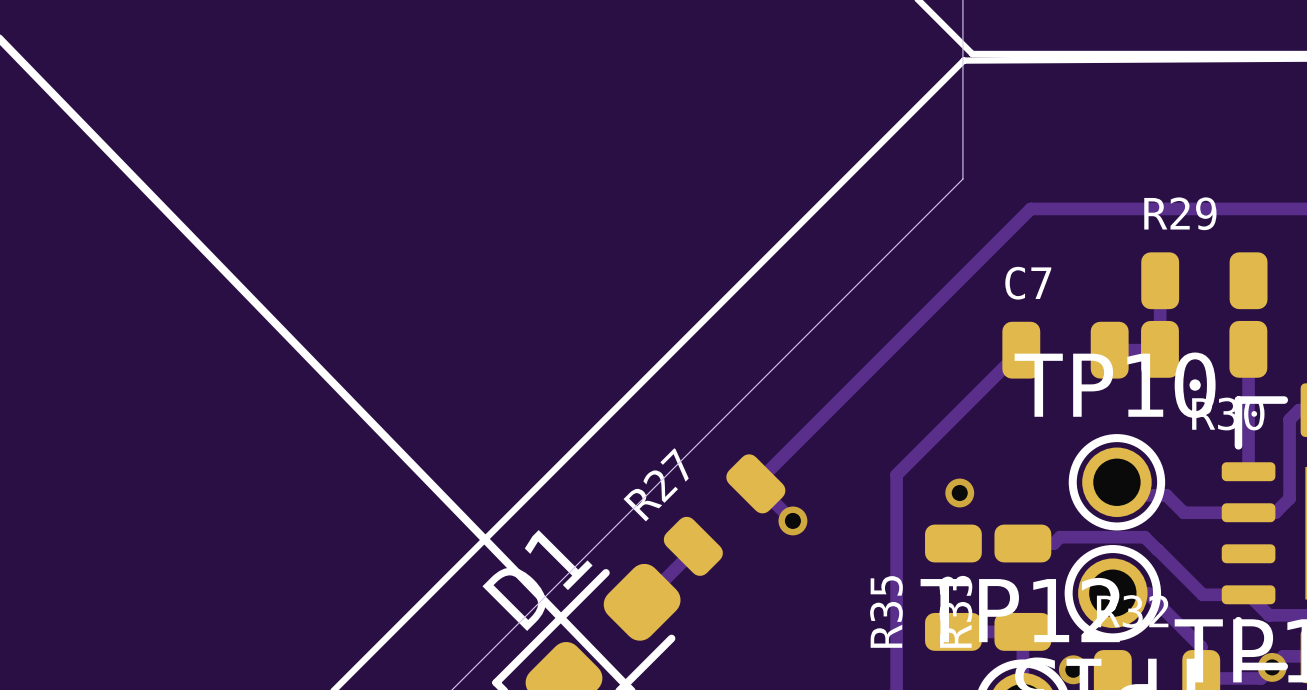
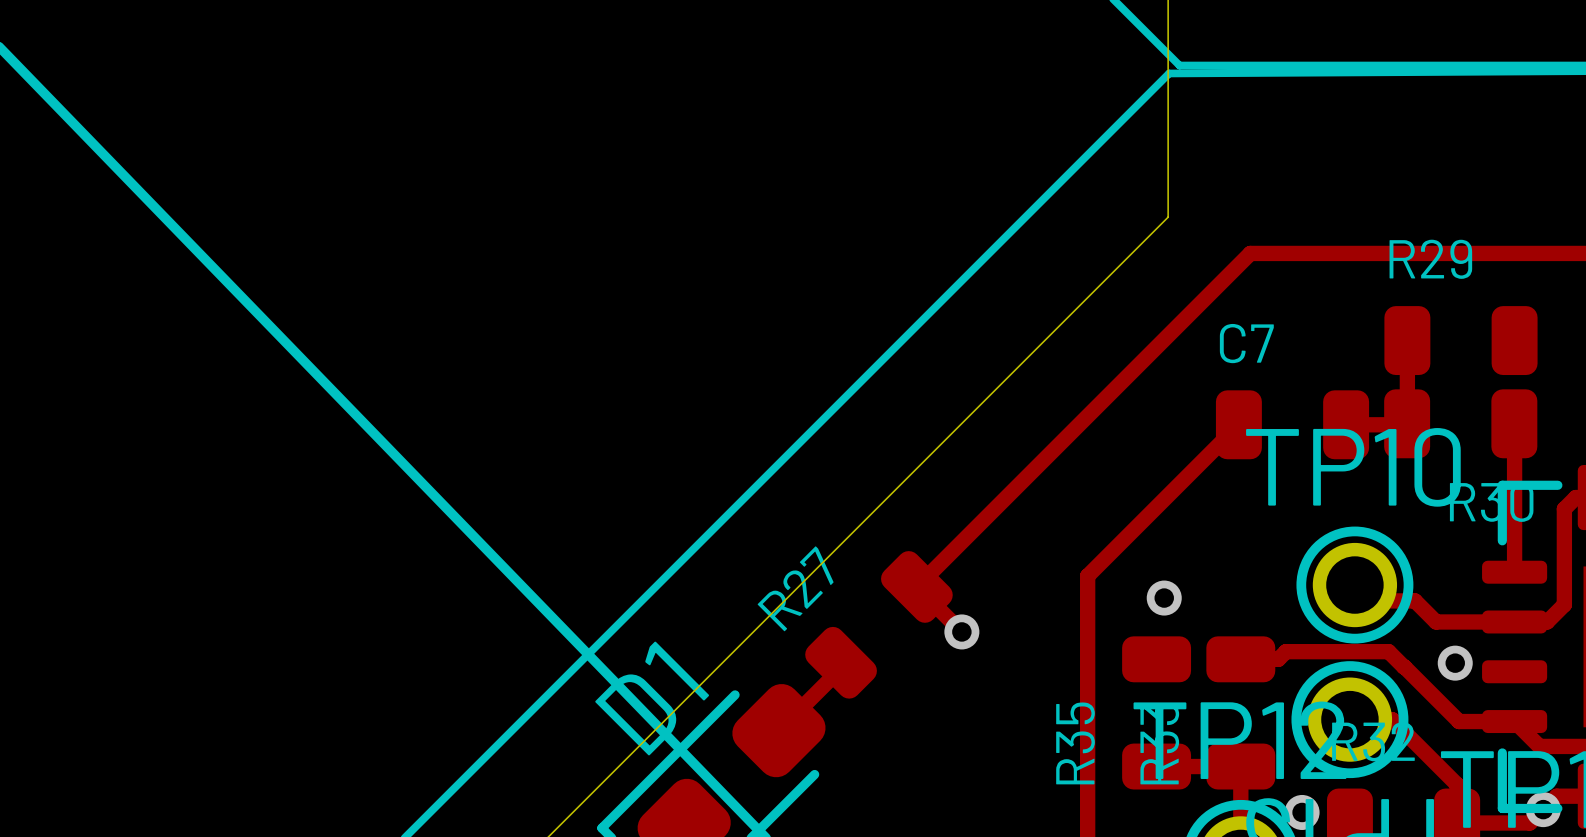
via: none -> (1455, 663)

